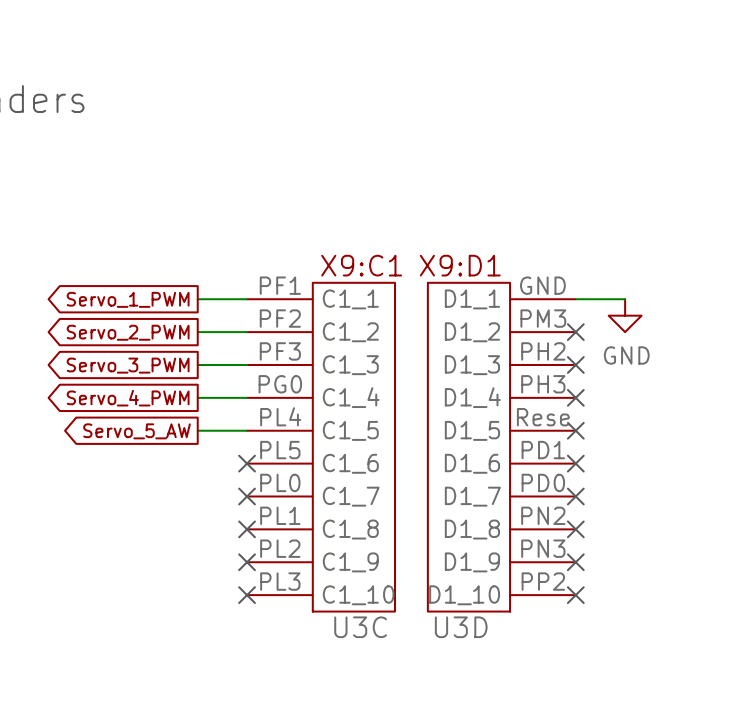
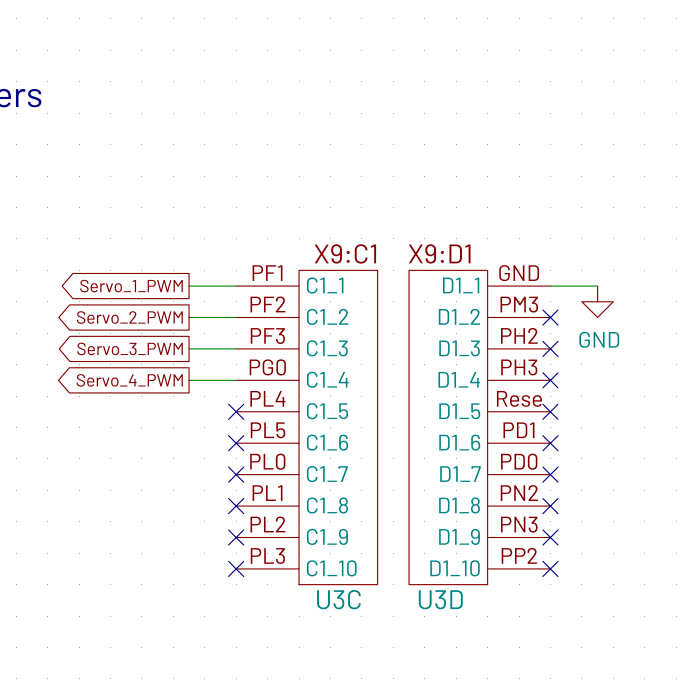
wire: (197, 430) (247, 430) -> none
no-connect mark: none -> (236, 411)
global label: Servo_5_AW (136, 431) -> none

